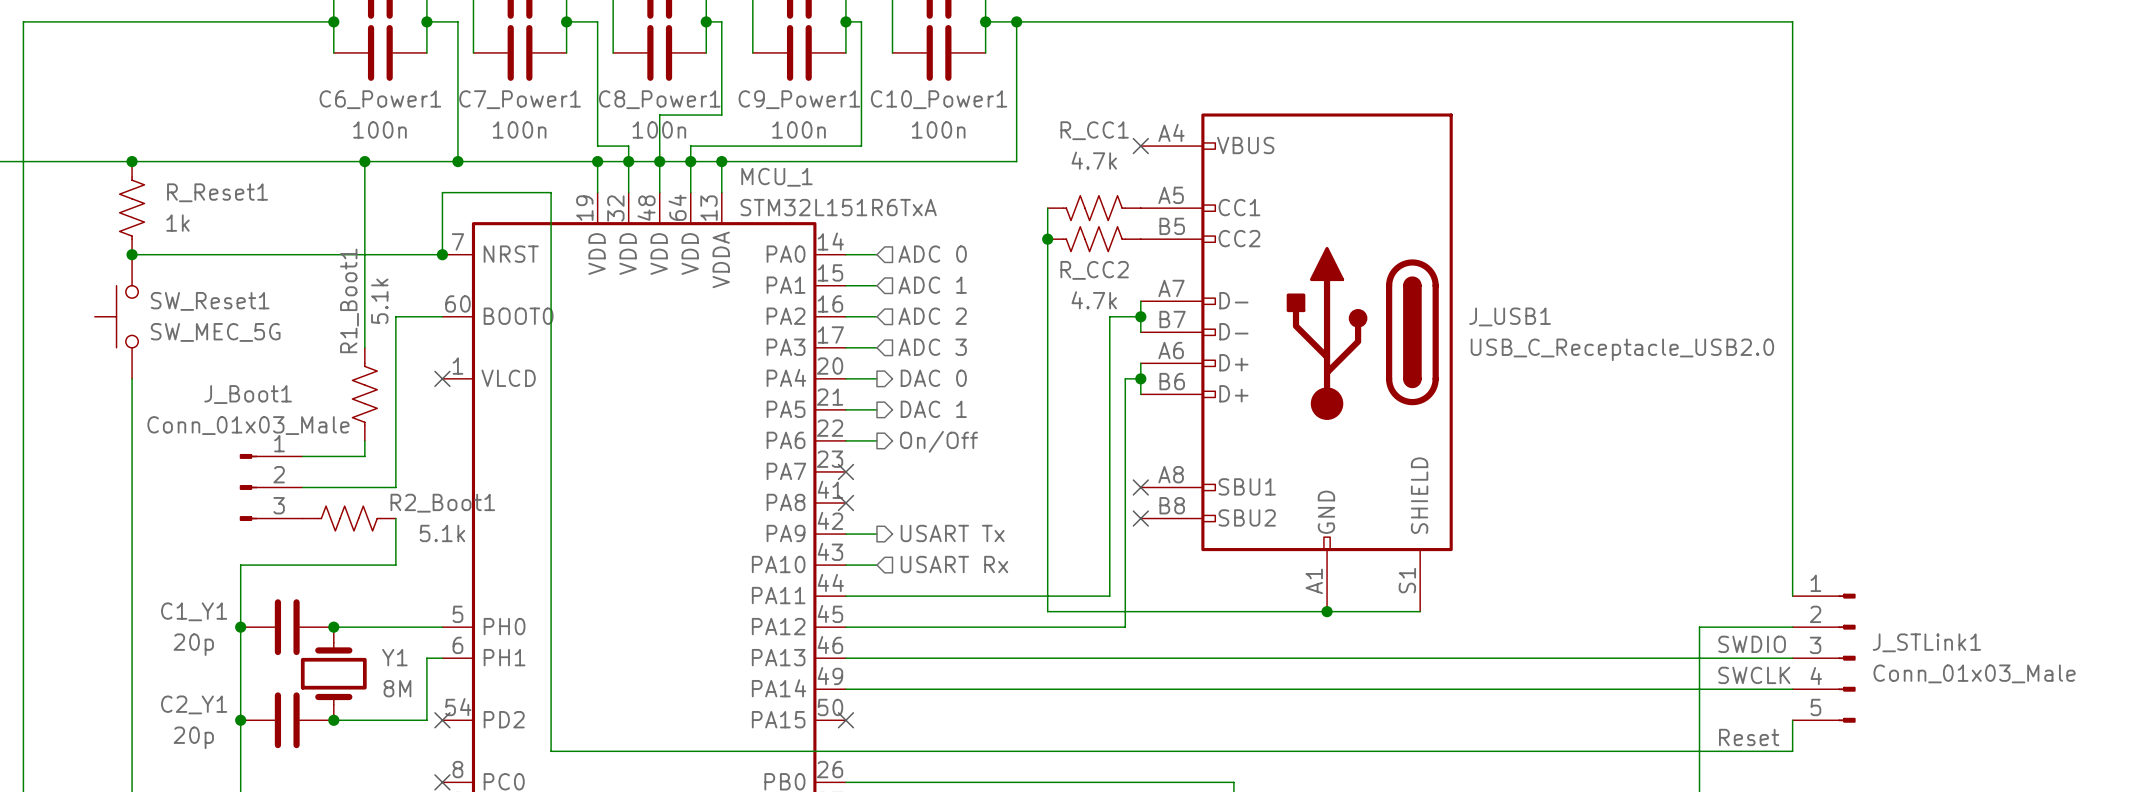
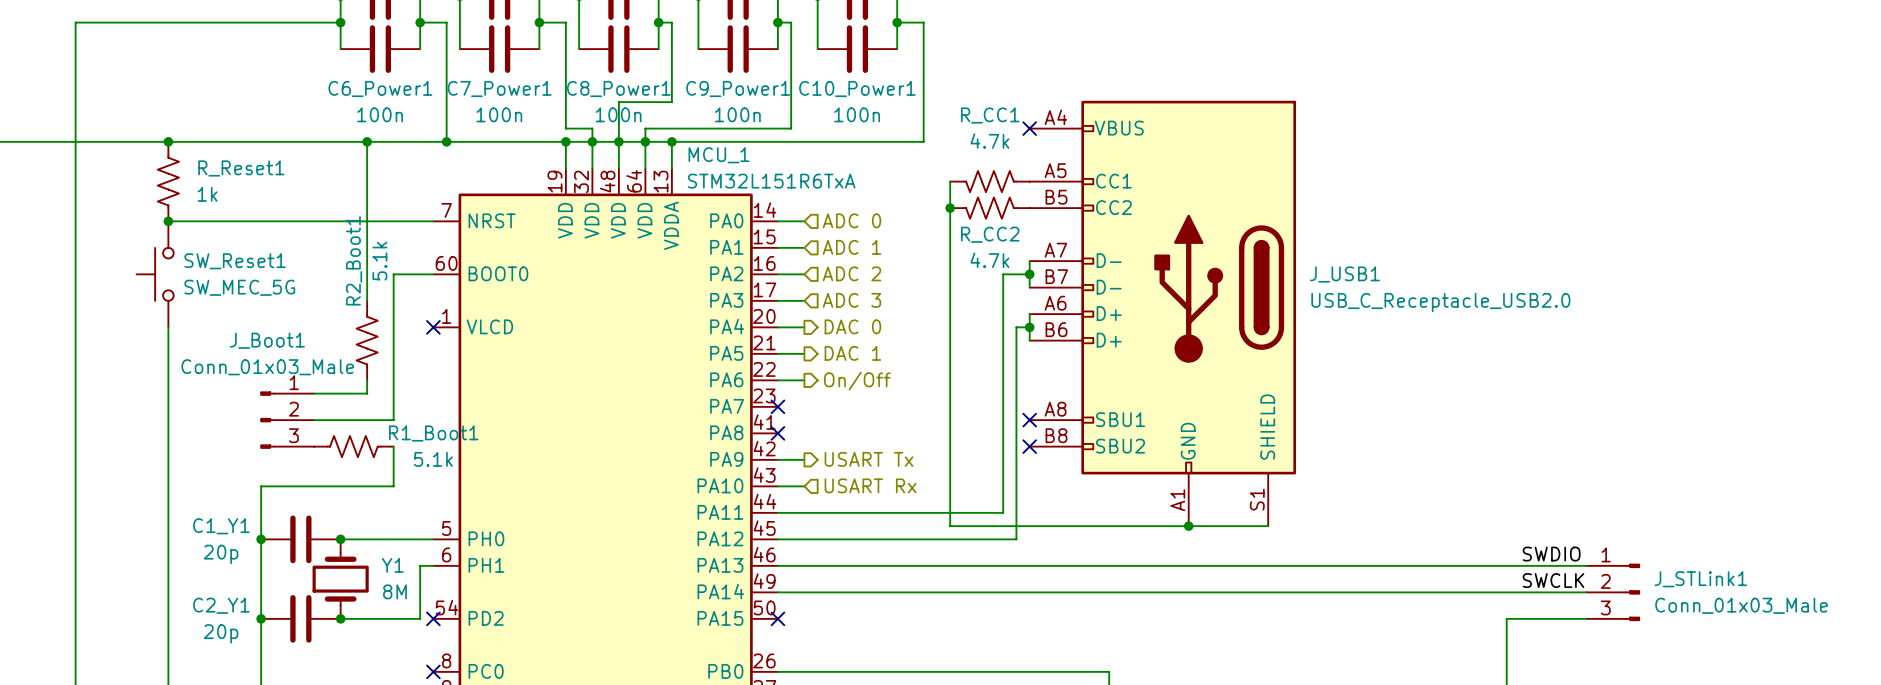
wire: (1016, 21) (1792, 21) (1792, 596) -> none
junction: (1016, 21) -> none
wire: (442, 254) (442, 192) (551, 192) (551, 751) (1792, 751) (1792, 720) -> none
junction: (442, 254) -> none
R1_Boot1 name: R1_Boot1 (349, 300) -> R2_Boot1 (354, 260)
R2_Boot1 name: R2_Boot1 (442, 503) -> R1_Boot1 (433, 433)
J_STLink1 symbol: [1792, 593, 1856, 723] -> [1586, 563, 1641, 622]
wire: (1792, 627) (1699, 627) (1699, 720) -> (1586, 618) (1506, 618)
label: Reset (1749, 737) -> none

